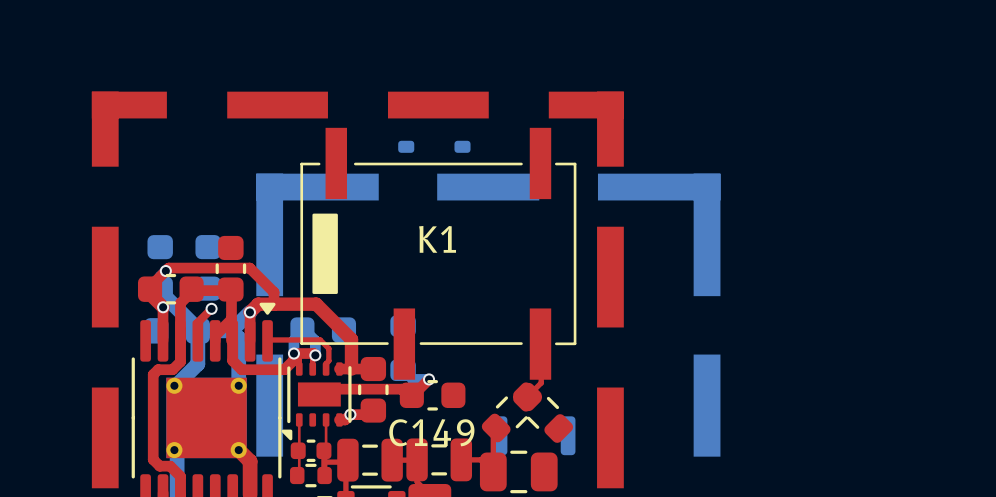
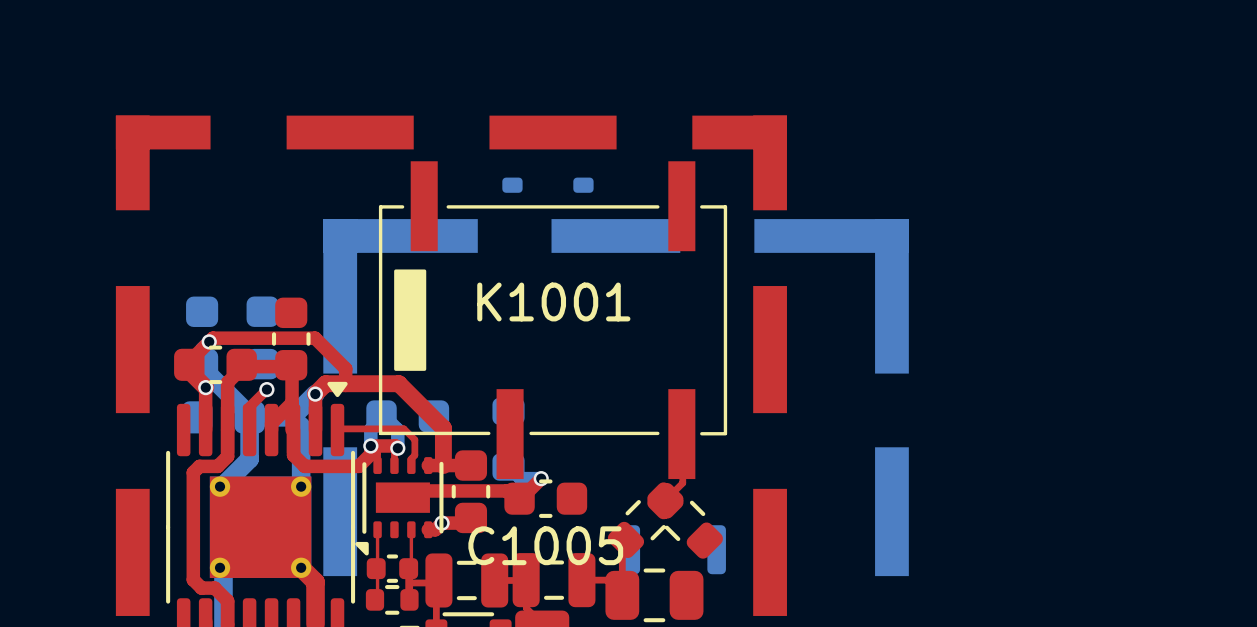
K1 name: K1 (437, 239) -> K1001 (553, 301)
C149 name: C149 (431, 432) -> C1005 (545, 545)

